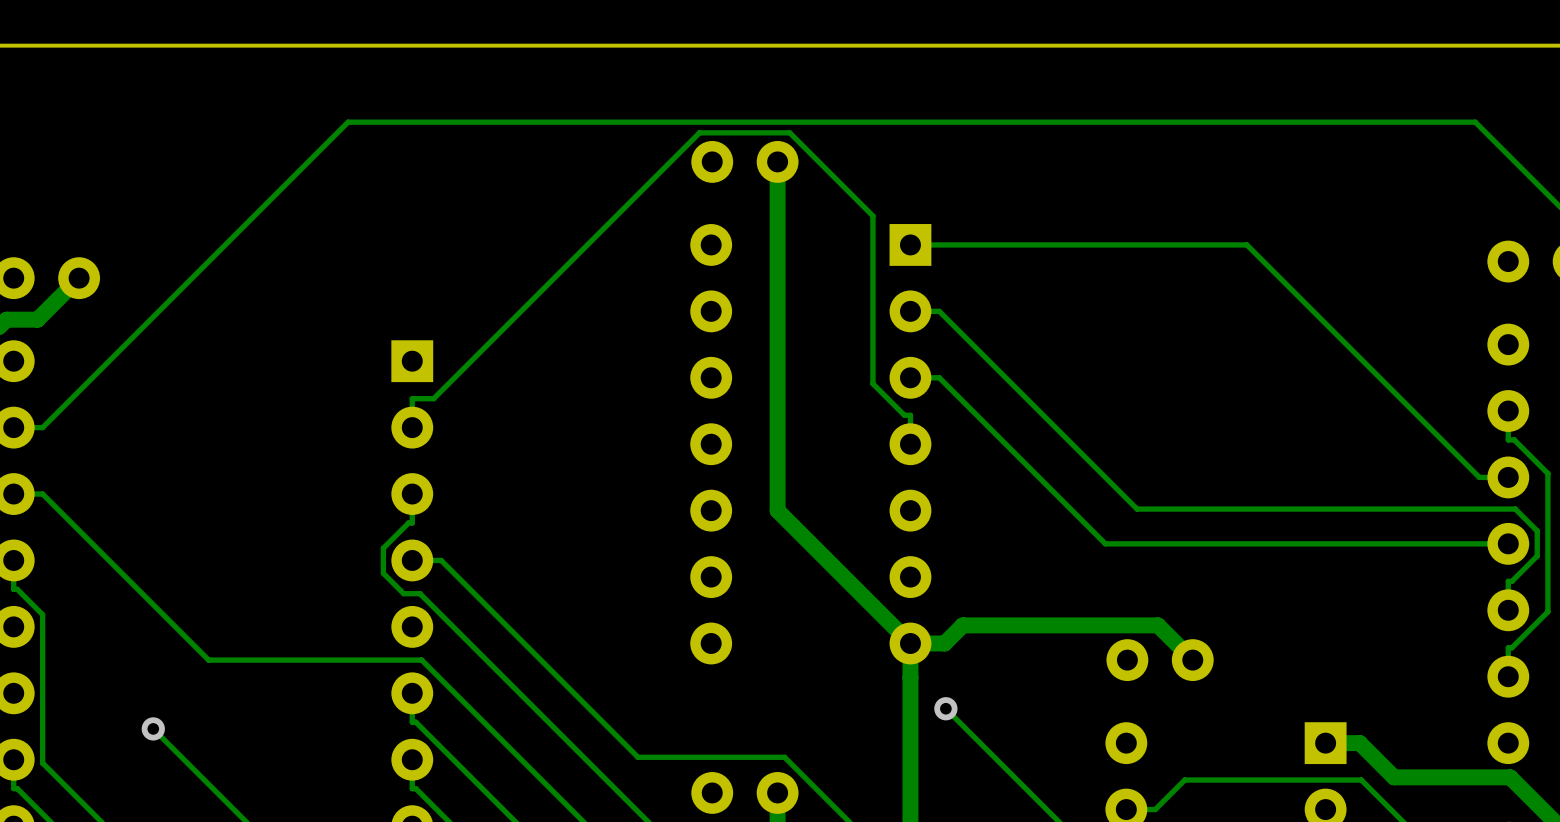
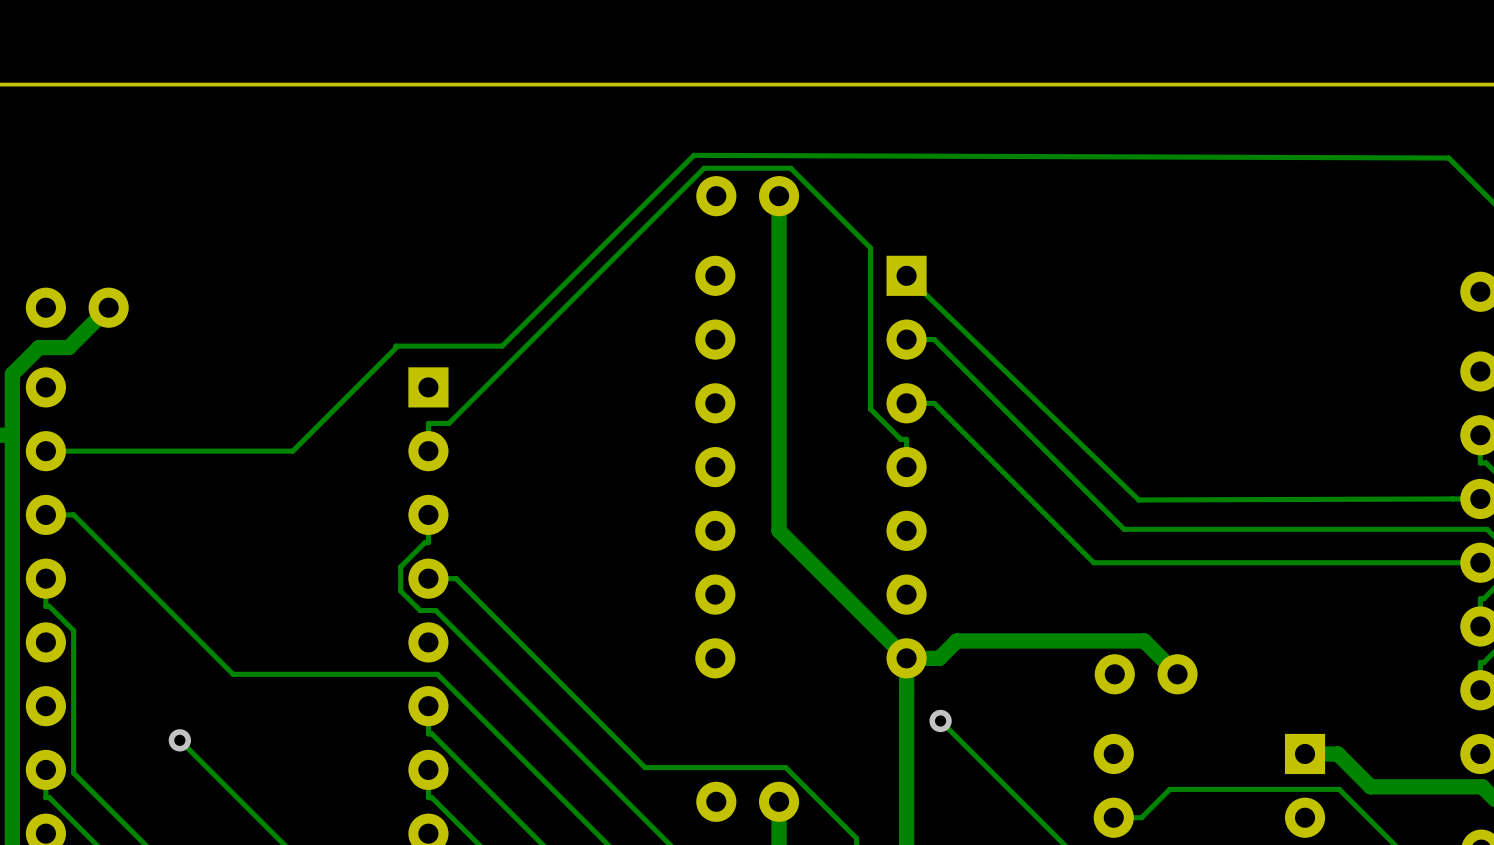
track: (1475, 122) (348, 122) (42, 427) -> (1448, 158) (693, 155) (502, 346) (395, 346) (292, 451) (73, 451)
track: (910, 244) (1246, 244) (1479, 477) -> (906, 275) (1138, 499) (1452, 498)

